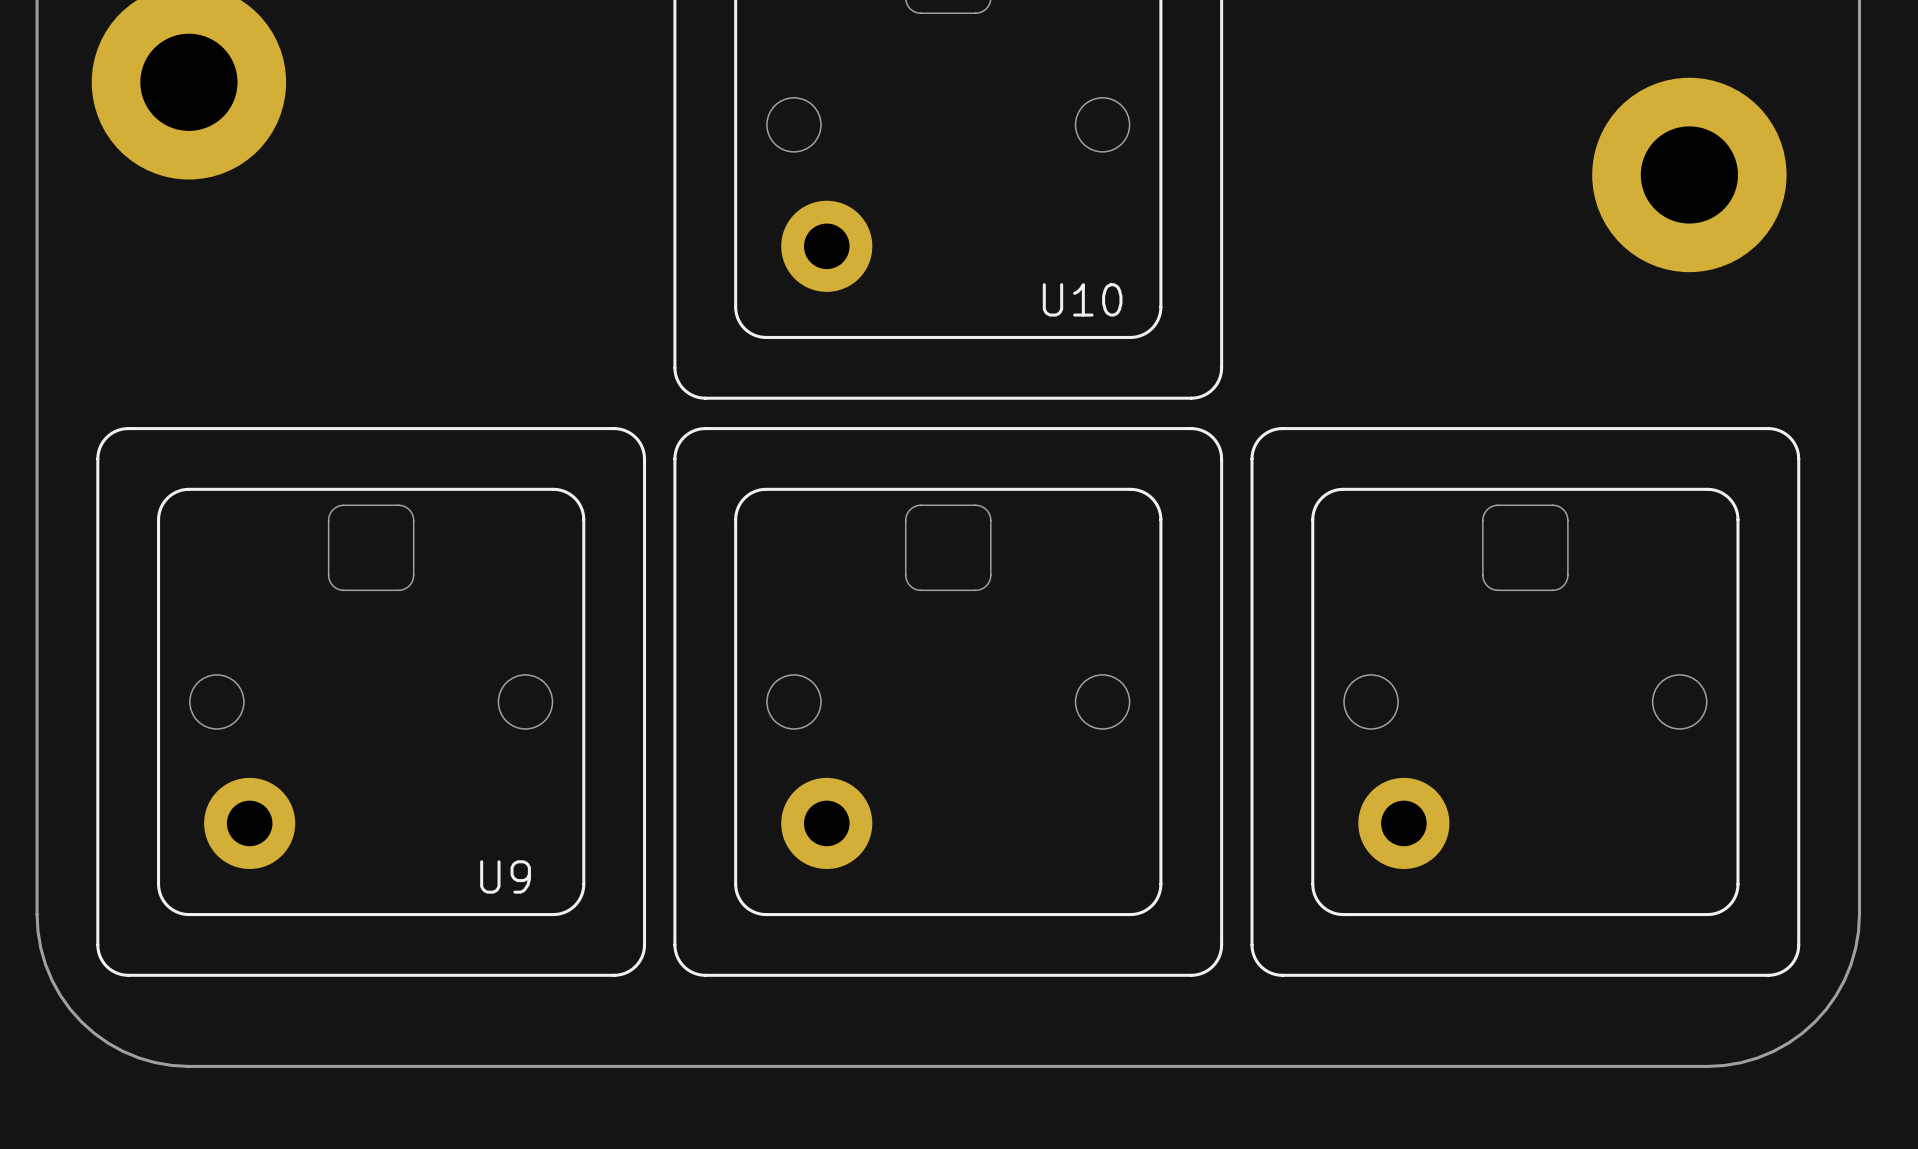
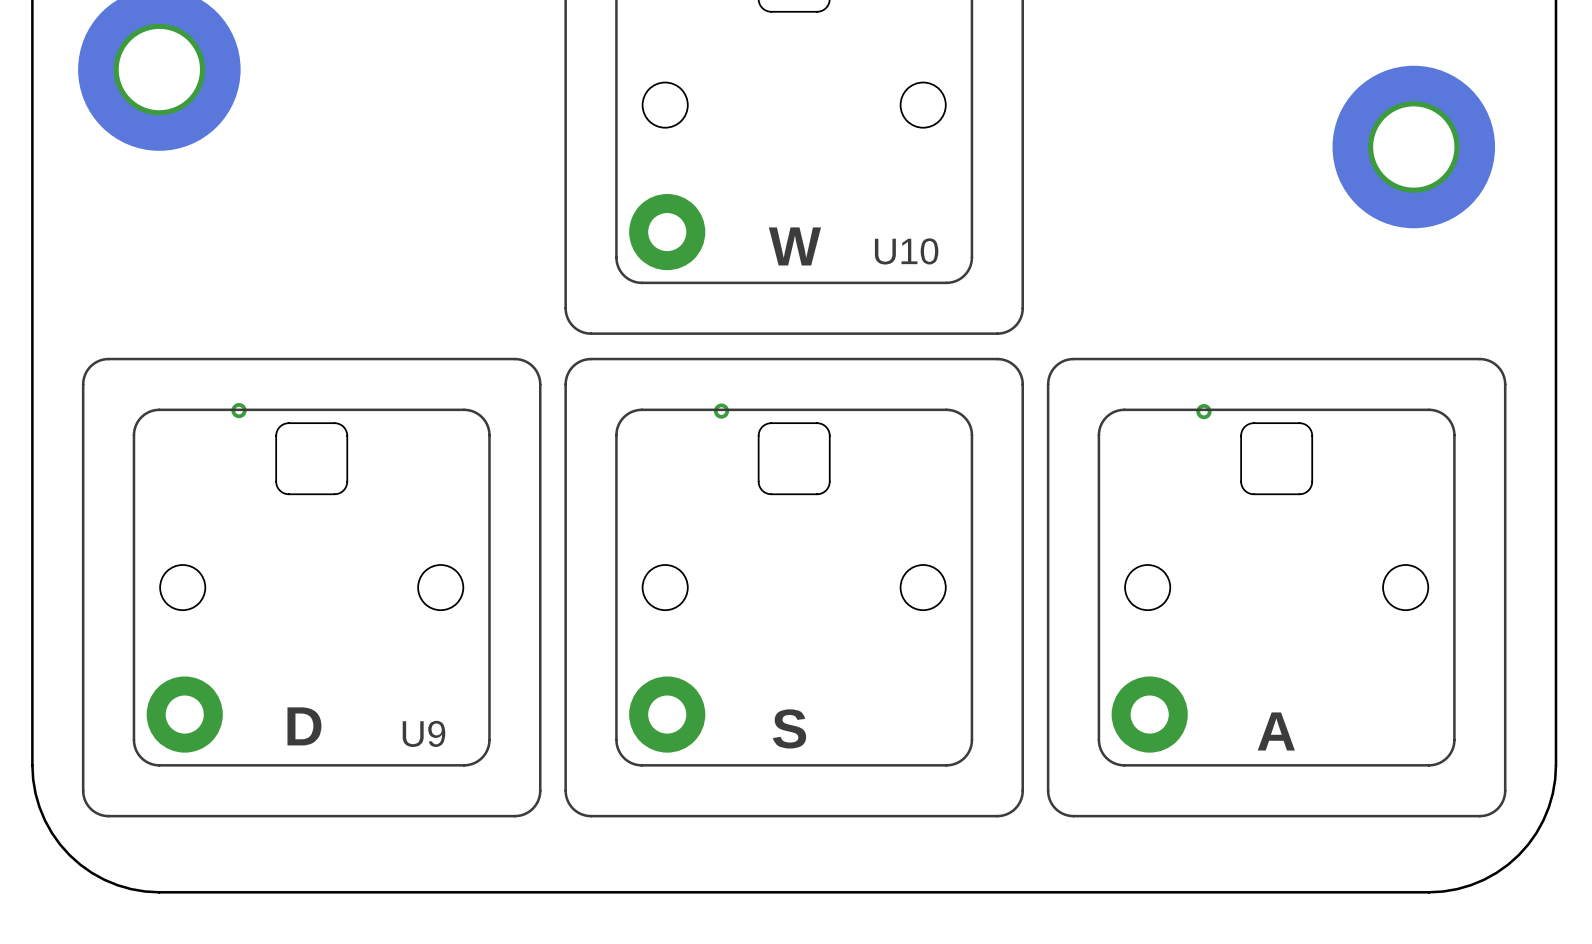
part position: (826, 246) -> (667, 232)
text: none -> W (794, 246)
via: none -> (239, 410)
via: none -> (721, 411)
via: none -> (1203, 411)
part position: (249, 823) -> (184, 714)
part position: (826, 823) -> (667, 714)
part position: (1403, 823) -> (1149, 714)
text: none -> D (304, 726)
text: none -> S (789, 728)
text: none -> A (1276, 731)

